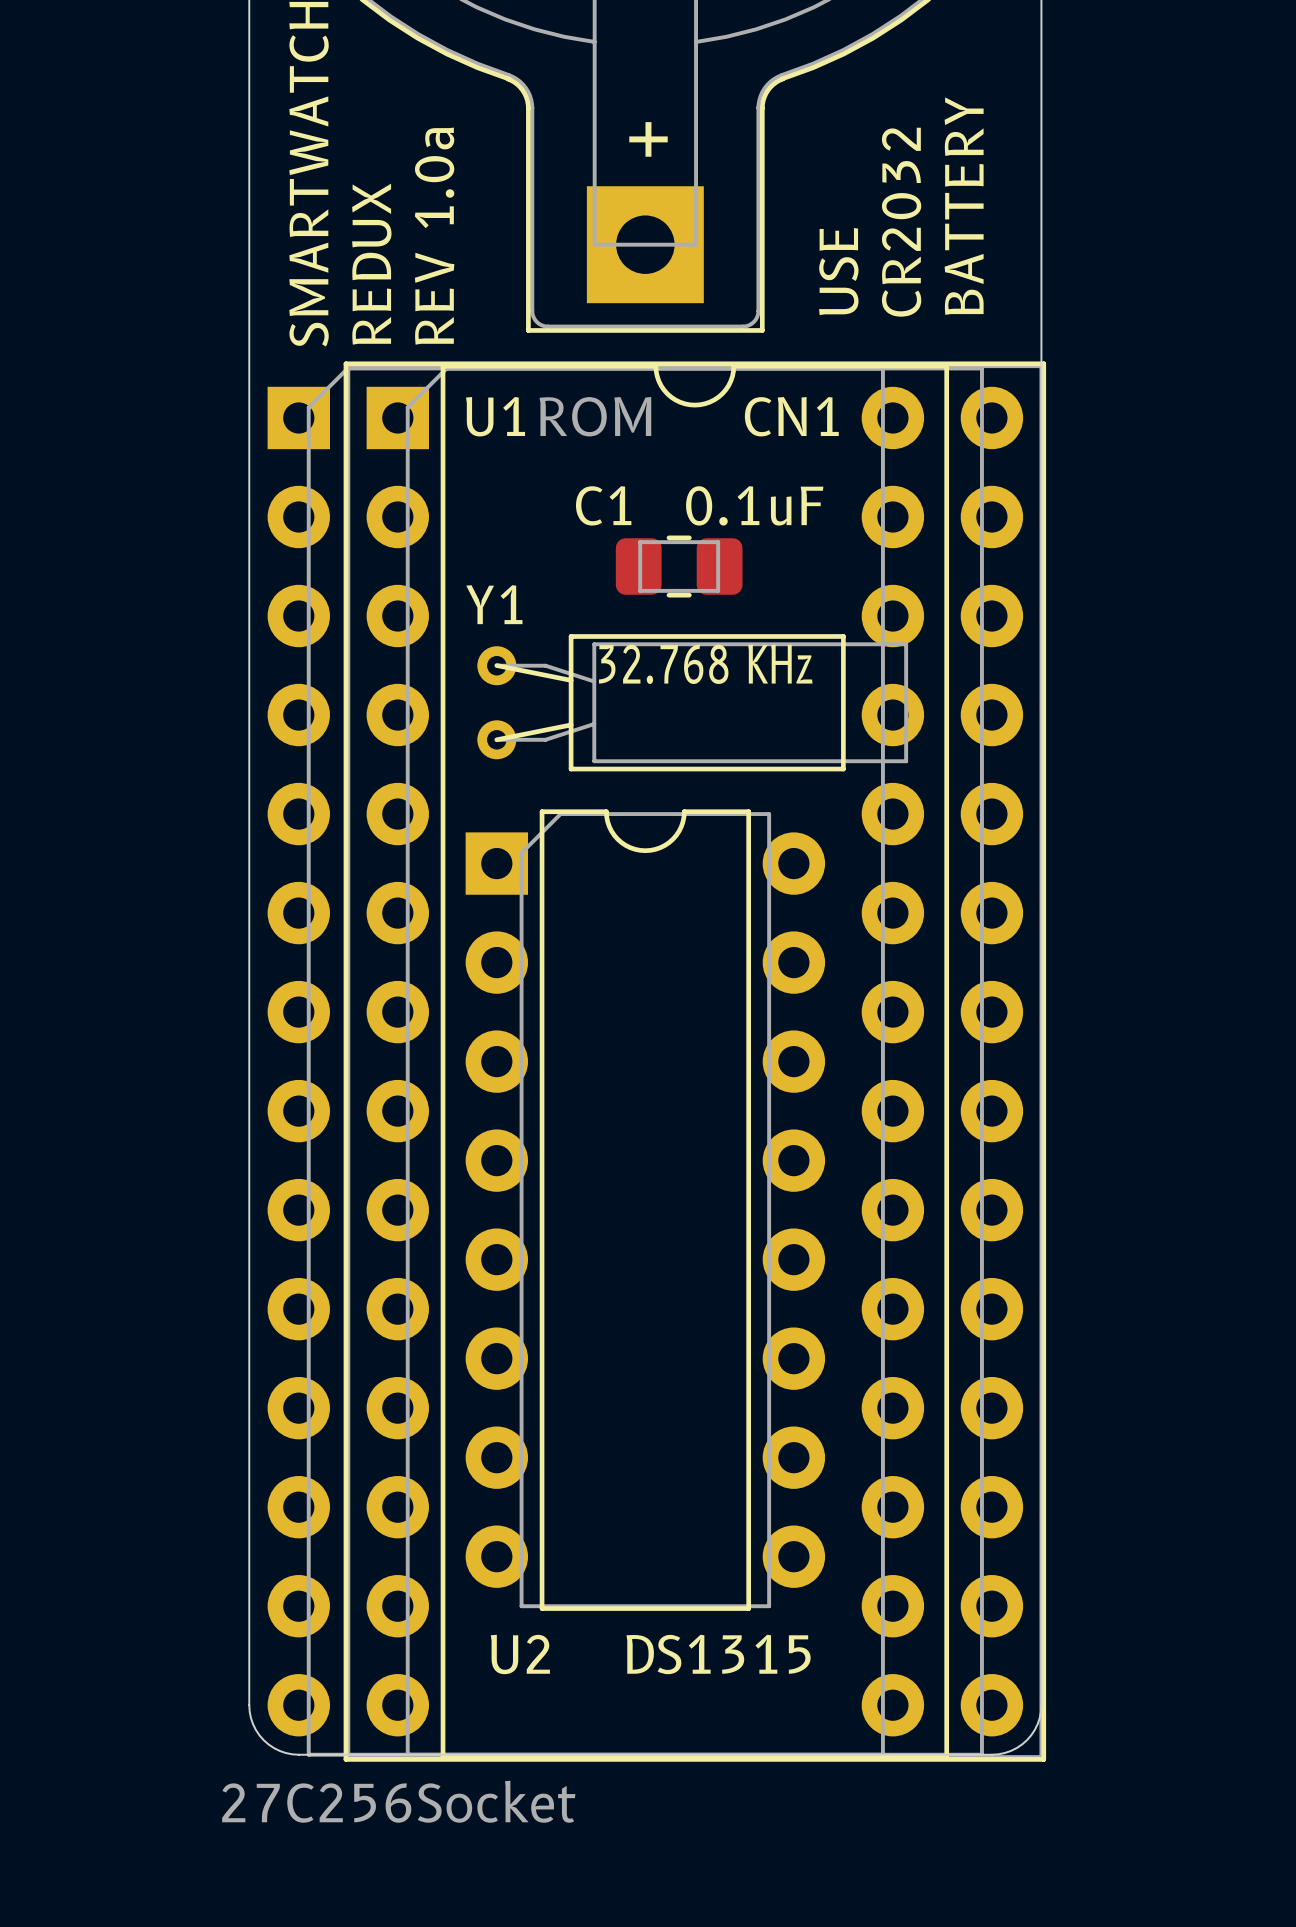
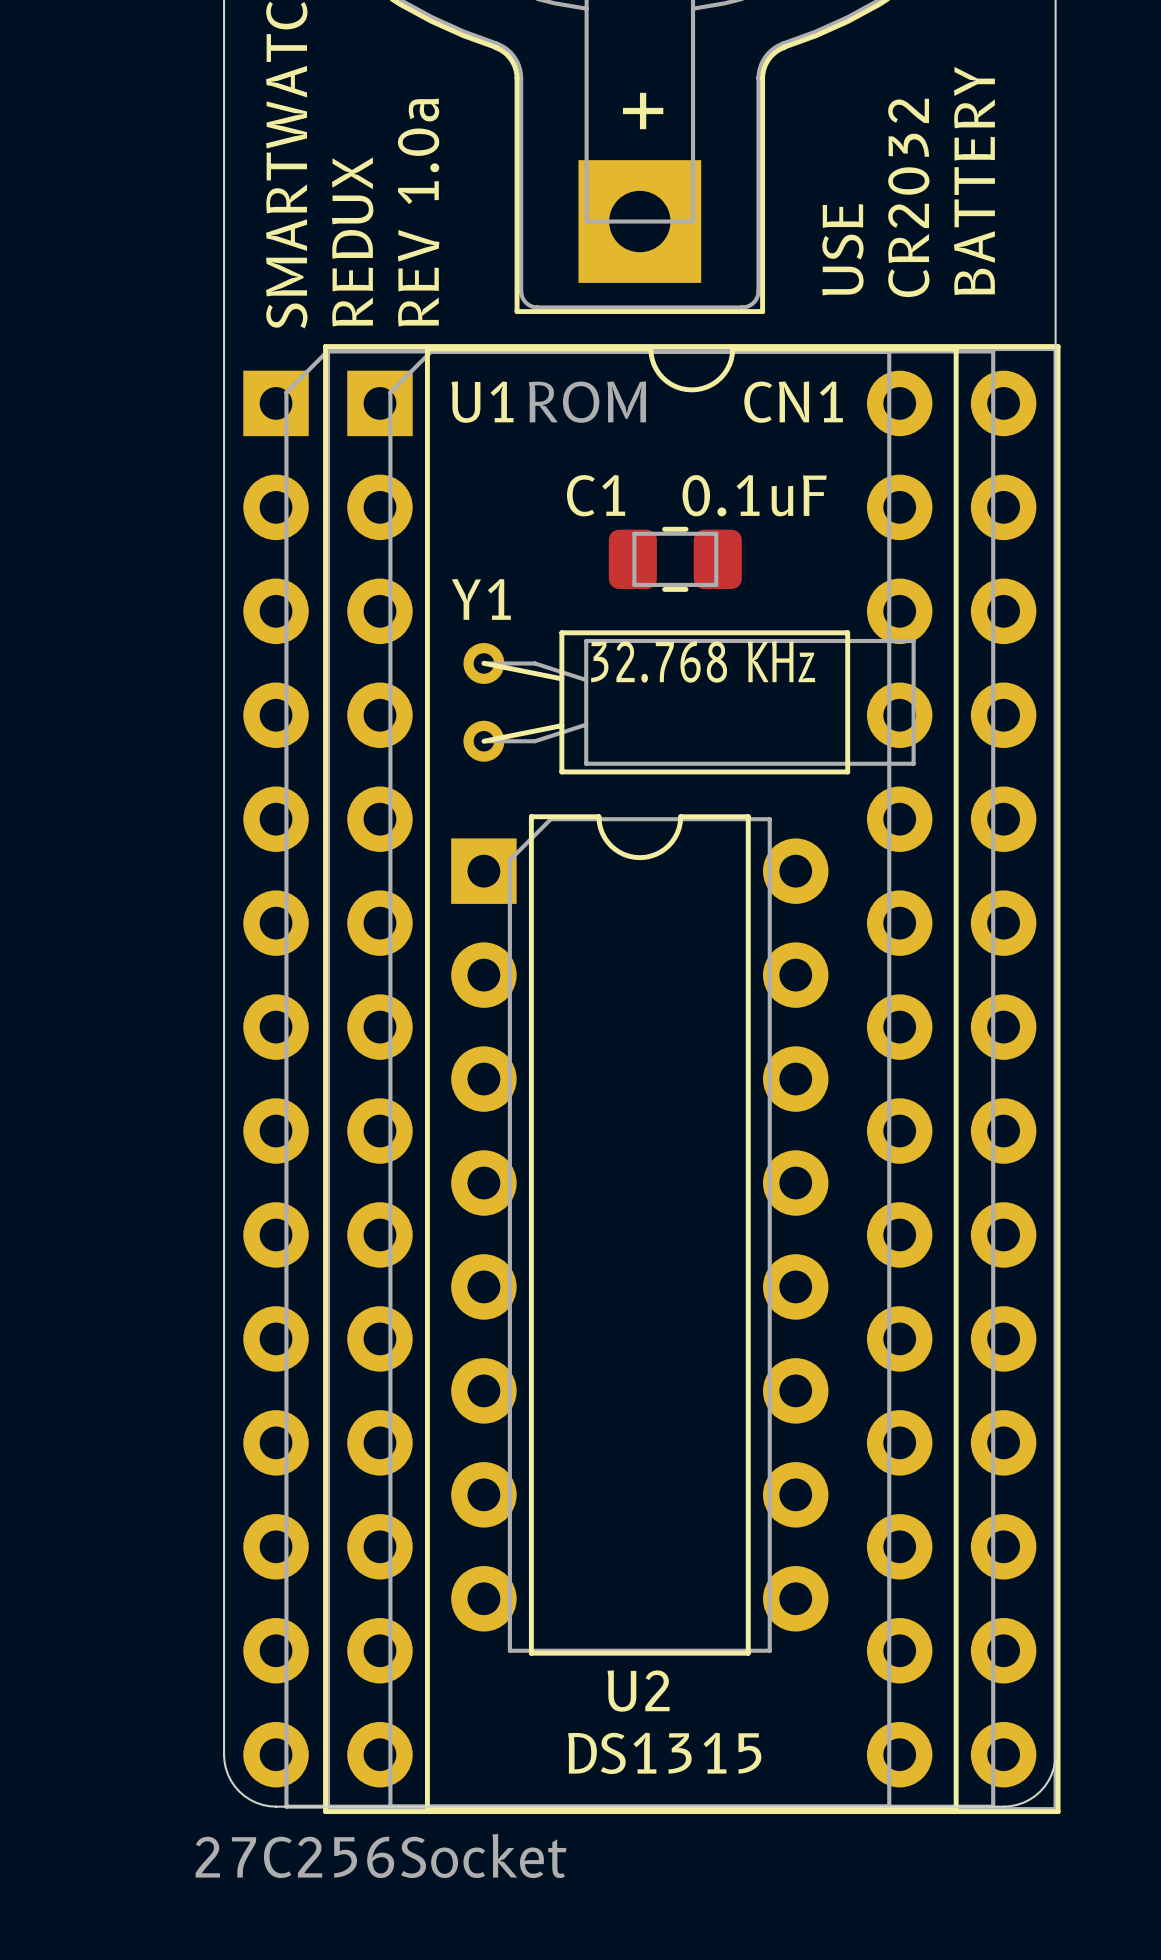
U2 name position: U2 (520, 1654) -> U2 (638, 1691)
U2 value position: DS1315 (718, 1654) -> DS1315 (664, 1753)

